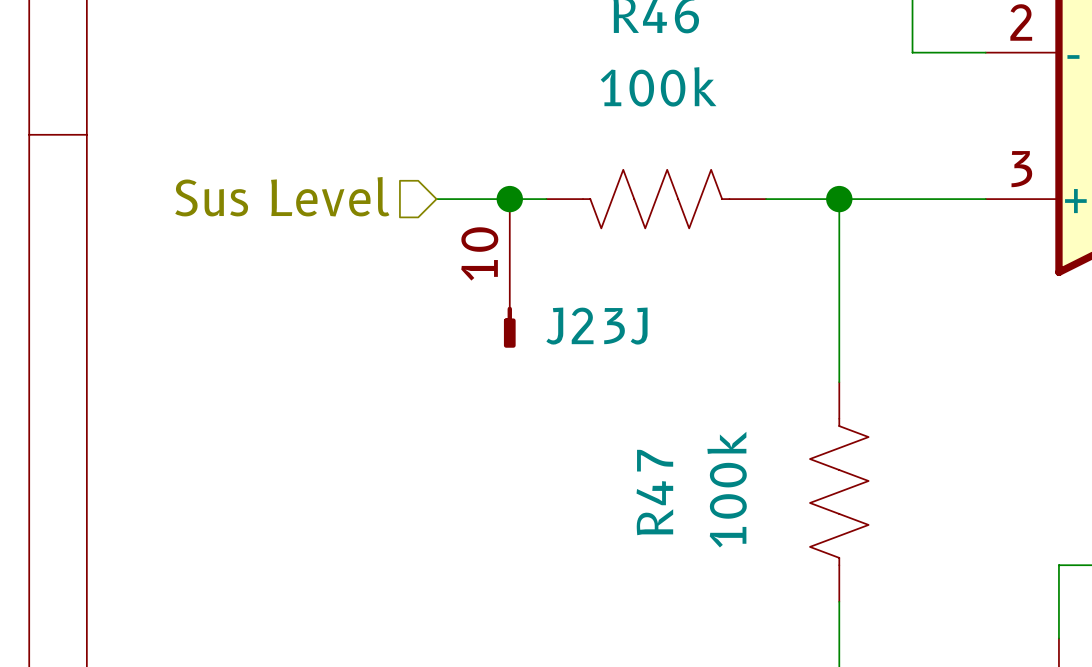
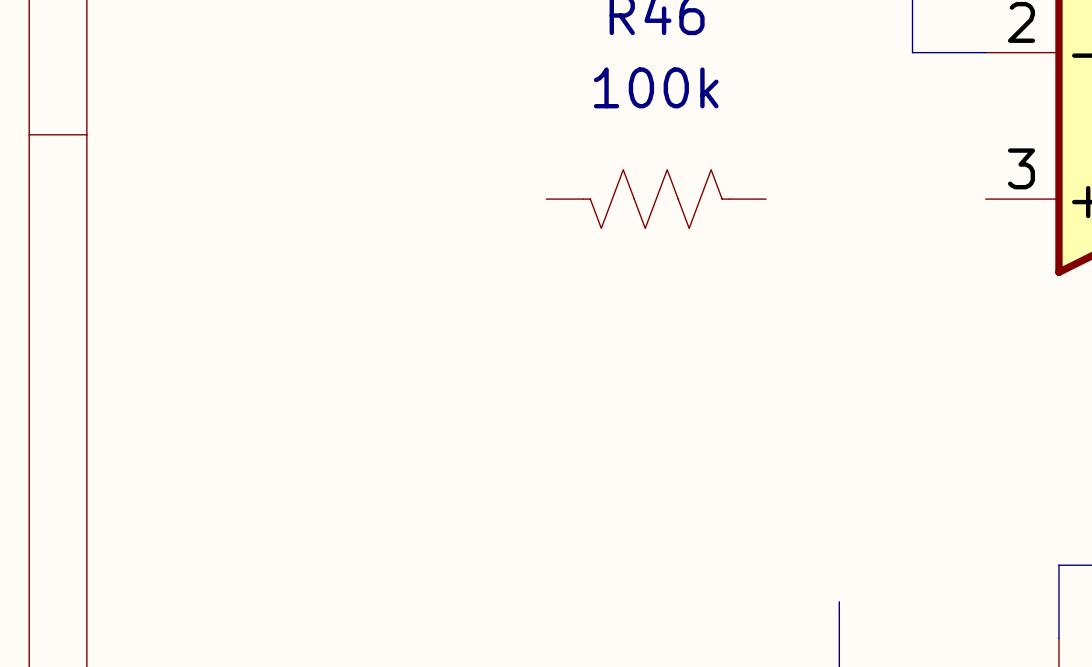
hierarchical label: Sus Level (282, 196) -> none
wire: (436, 199) (546, 199) -> none
junction: (509, 199) -> none
wire: (766, 199) (985, 199) -> none
wire: (839, 199) (839, 382) -> none
junction: (839, 199) -> none
J23J: (509, 273) -> none
R47: 100k (839, 491) -> none

